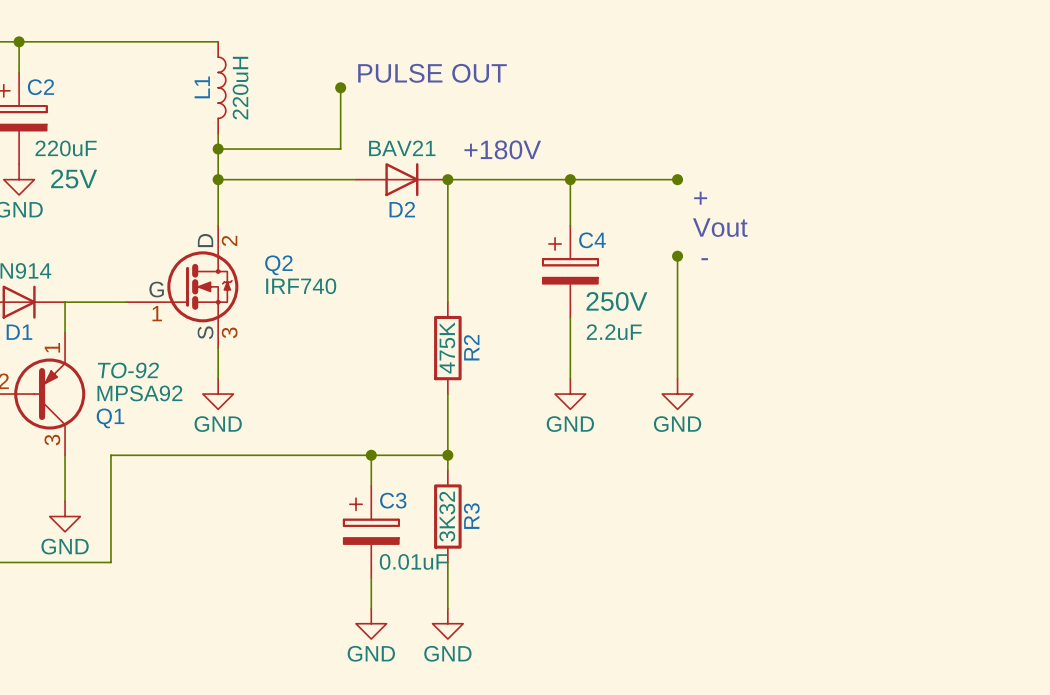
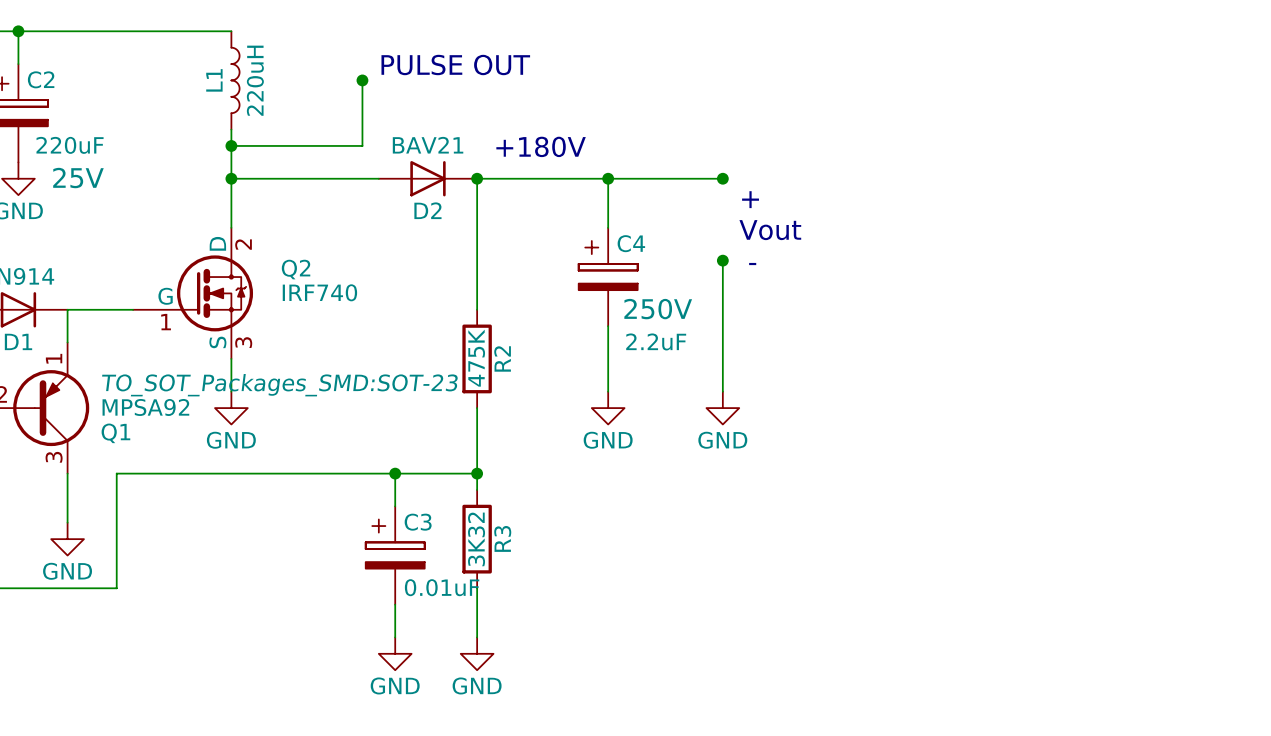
Q1 text: TO-92 (128, 370) -> TO_SOT_Packages_SMD:SOT-23 (279, 385)

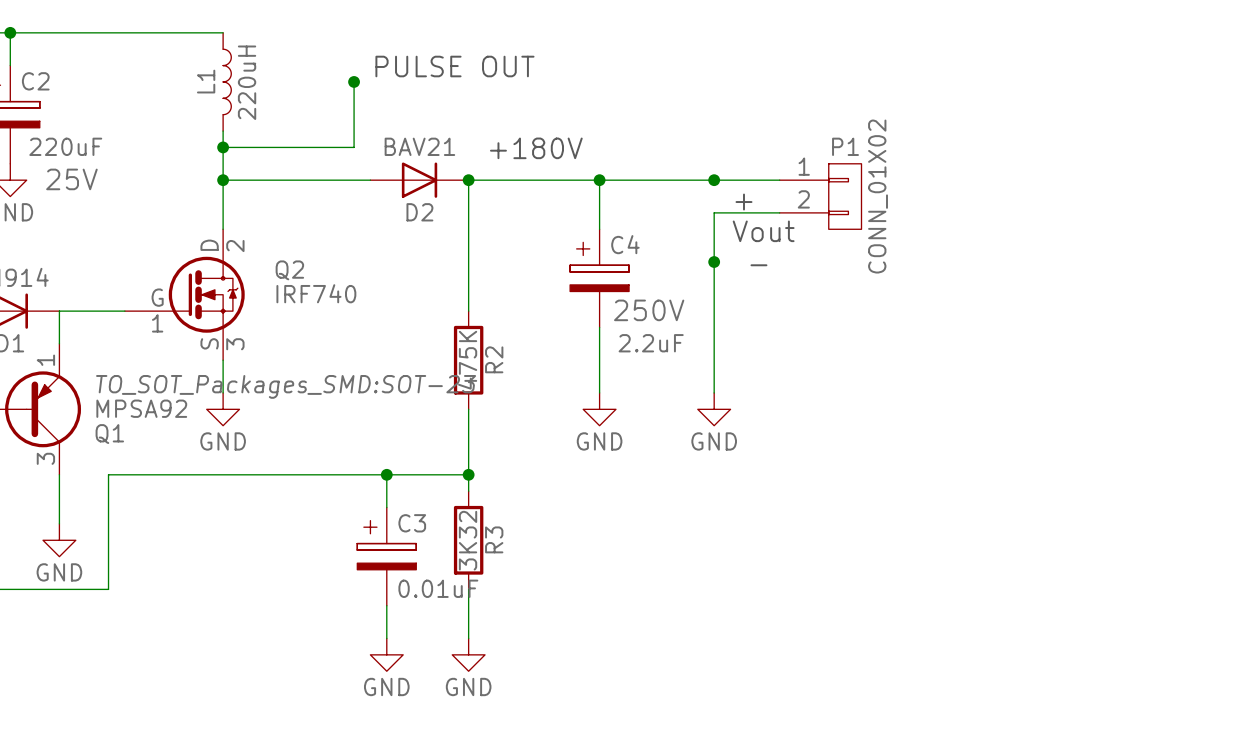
wire: none -> (714, 180) (779, 180)
P1: none -> CONN_01X02 (820, 196)
wire: none -> (779, 212) (714, 212) (714, 262)

